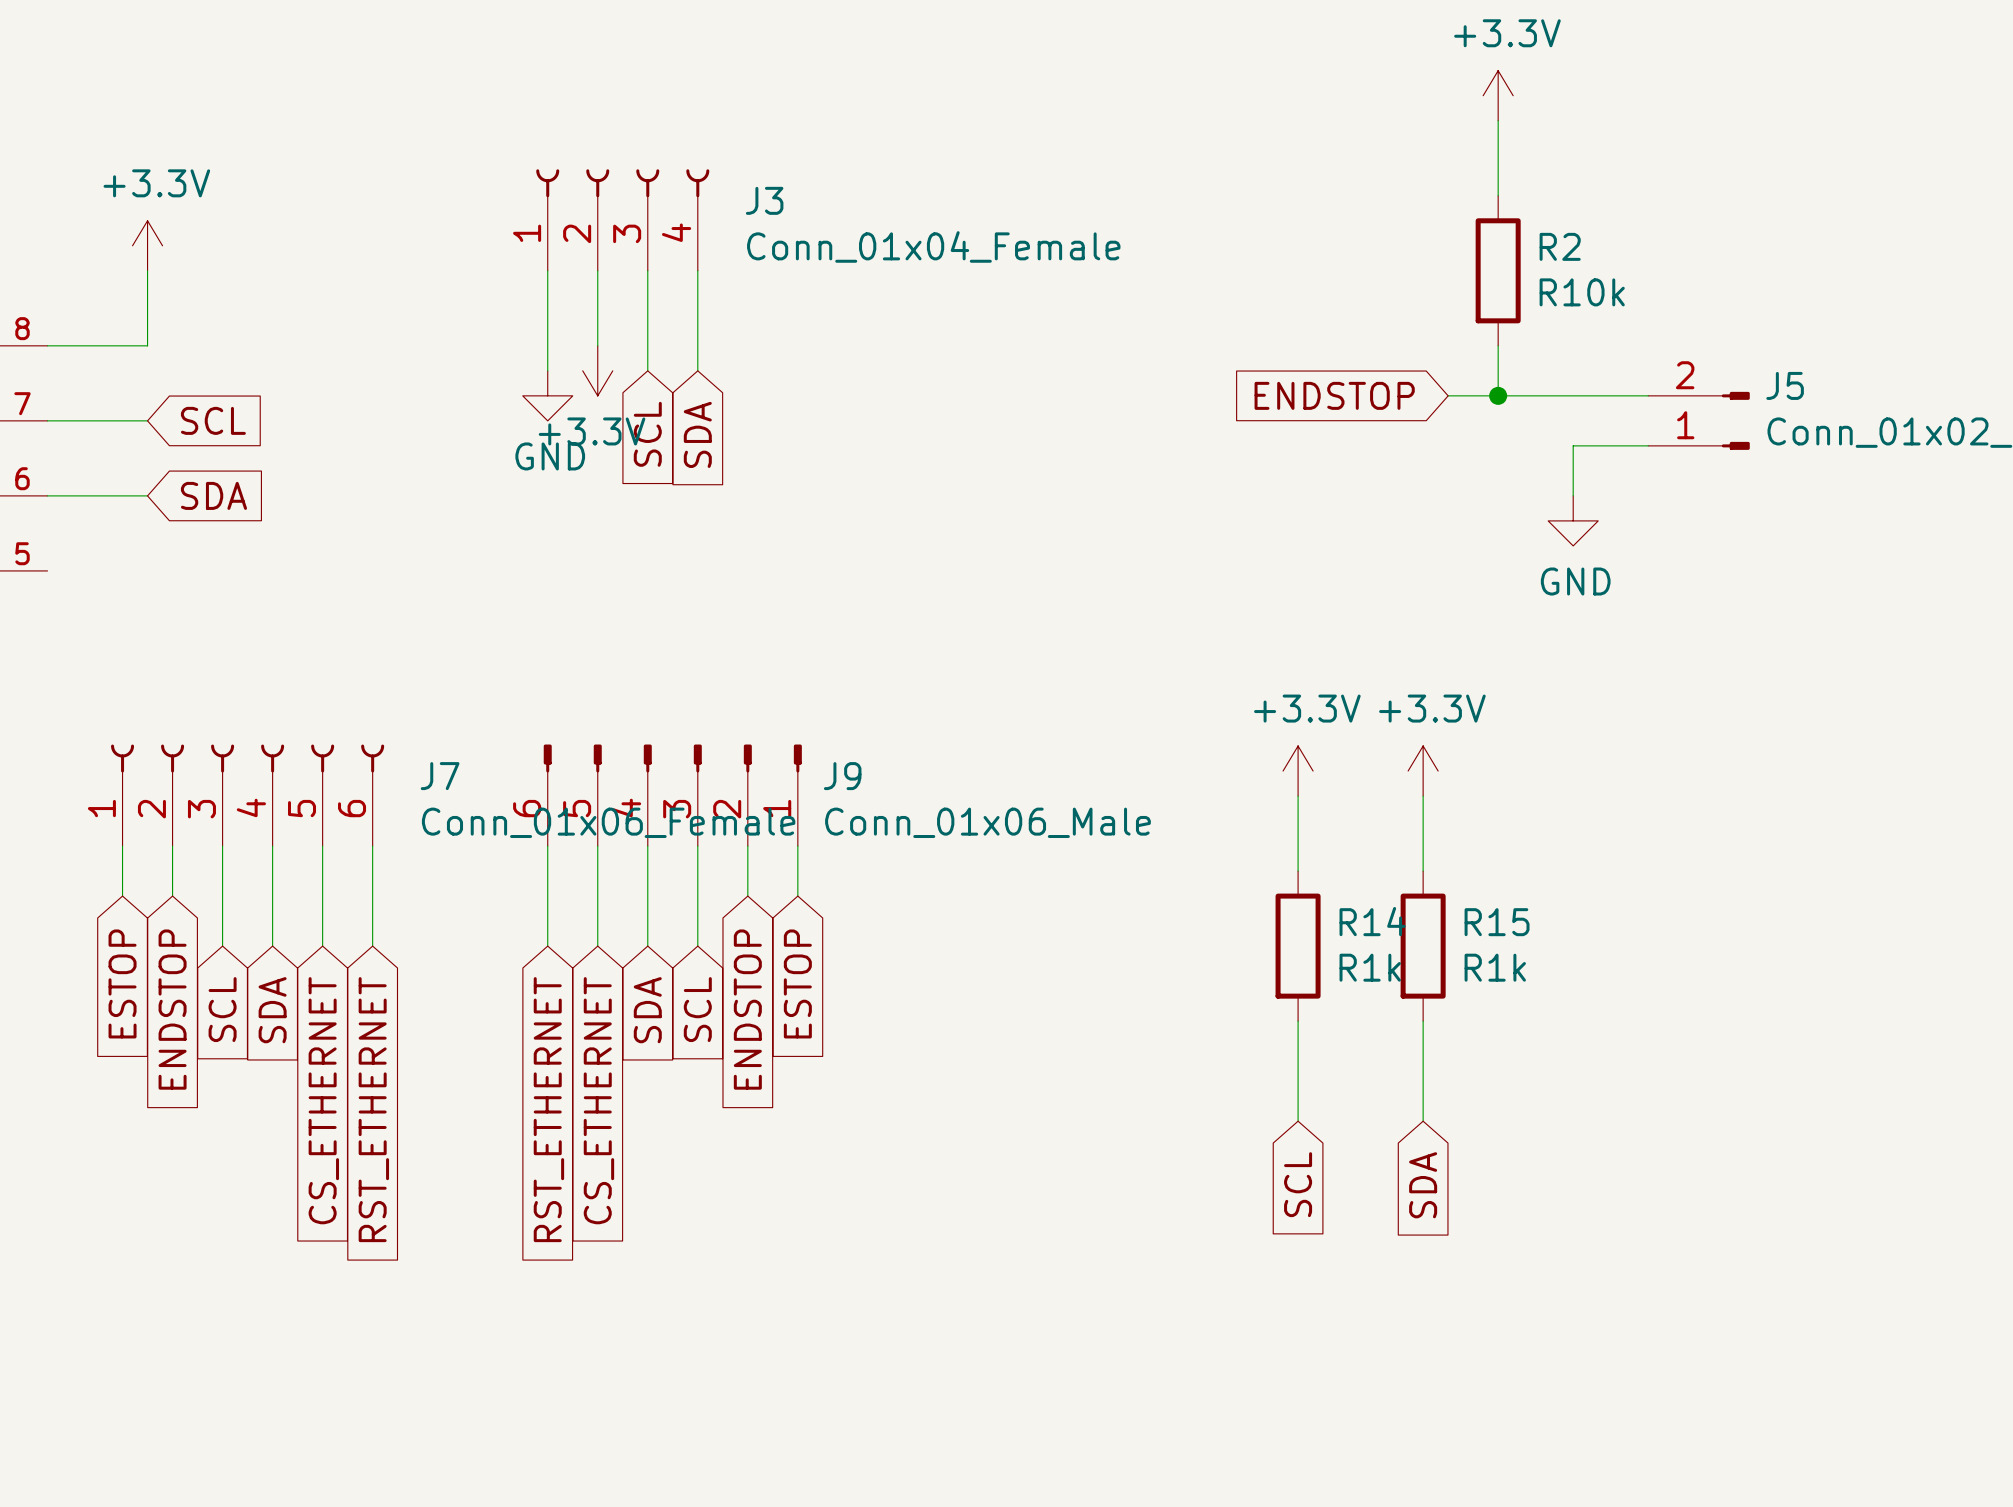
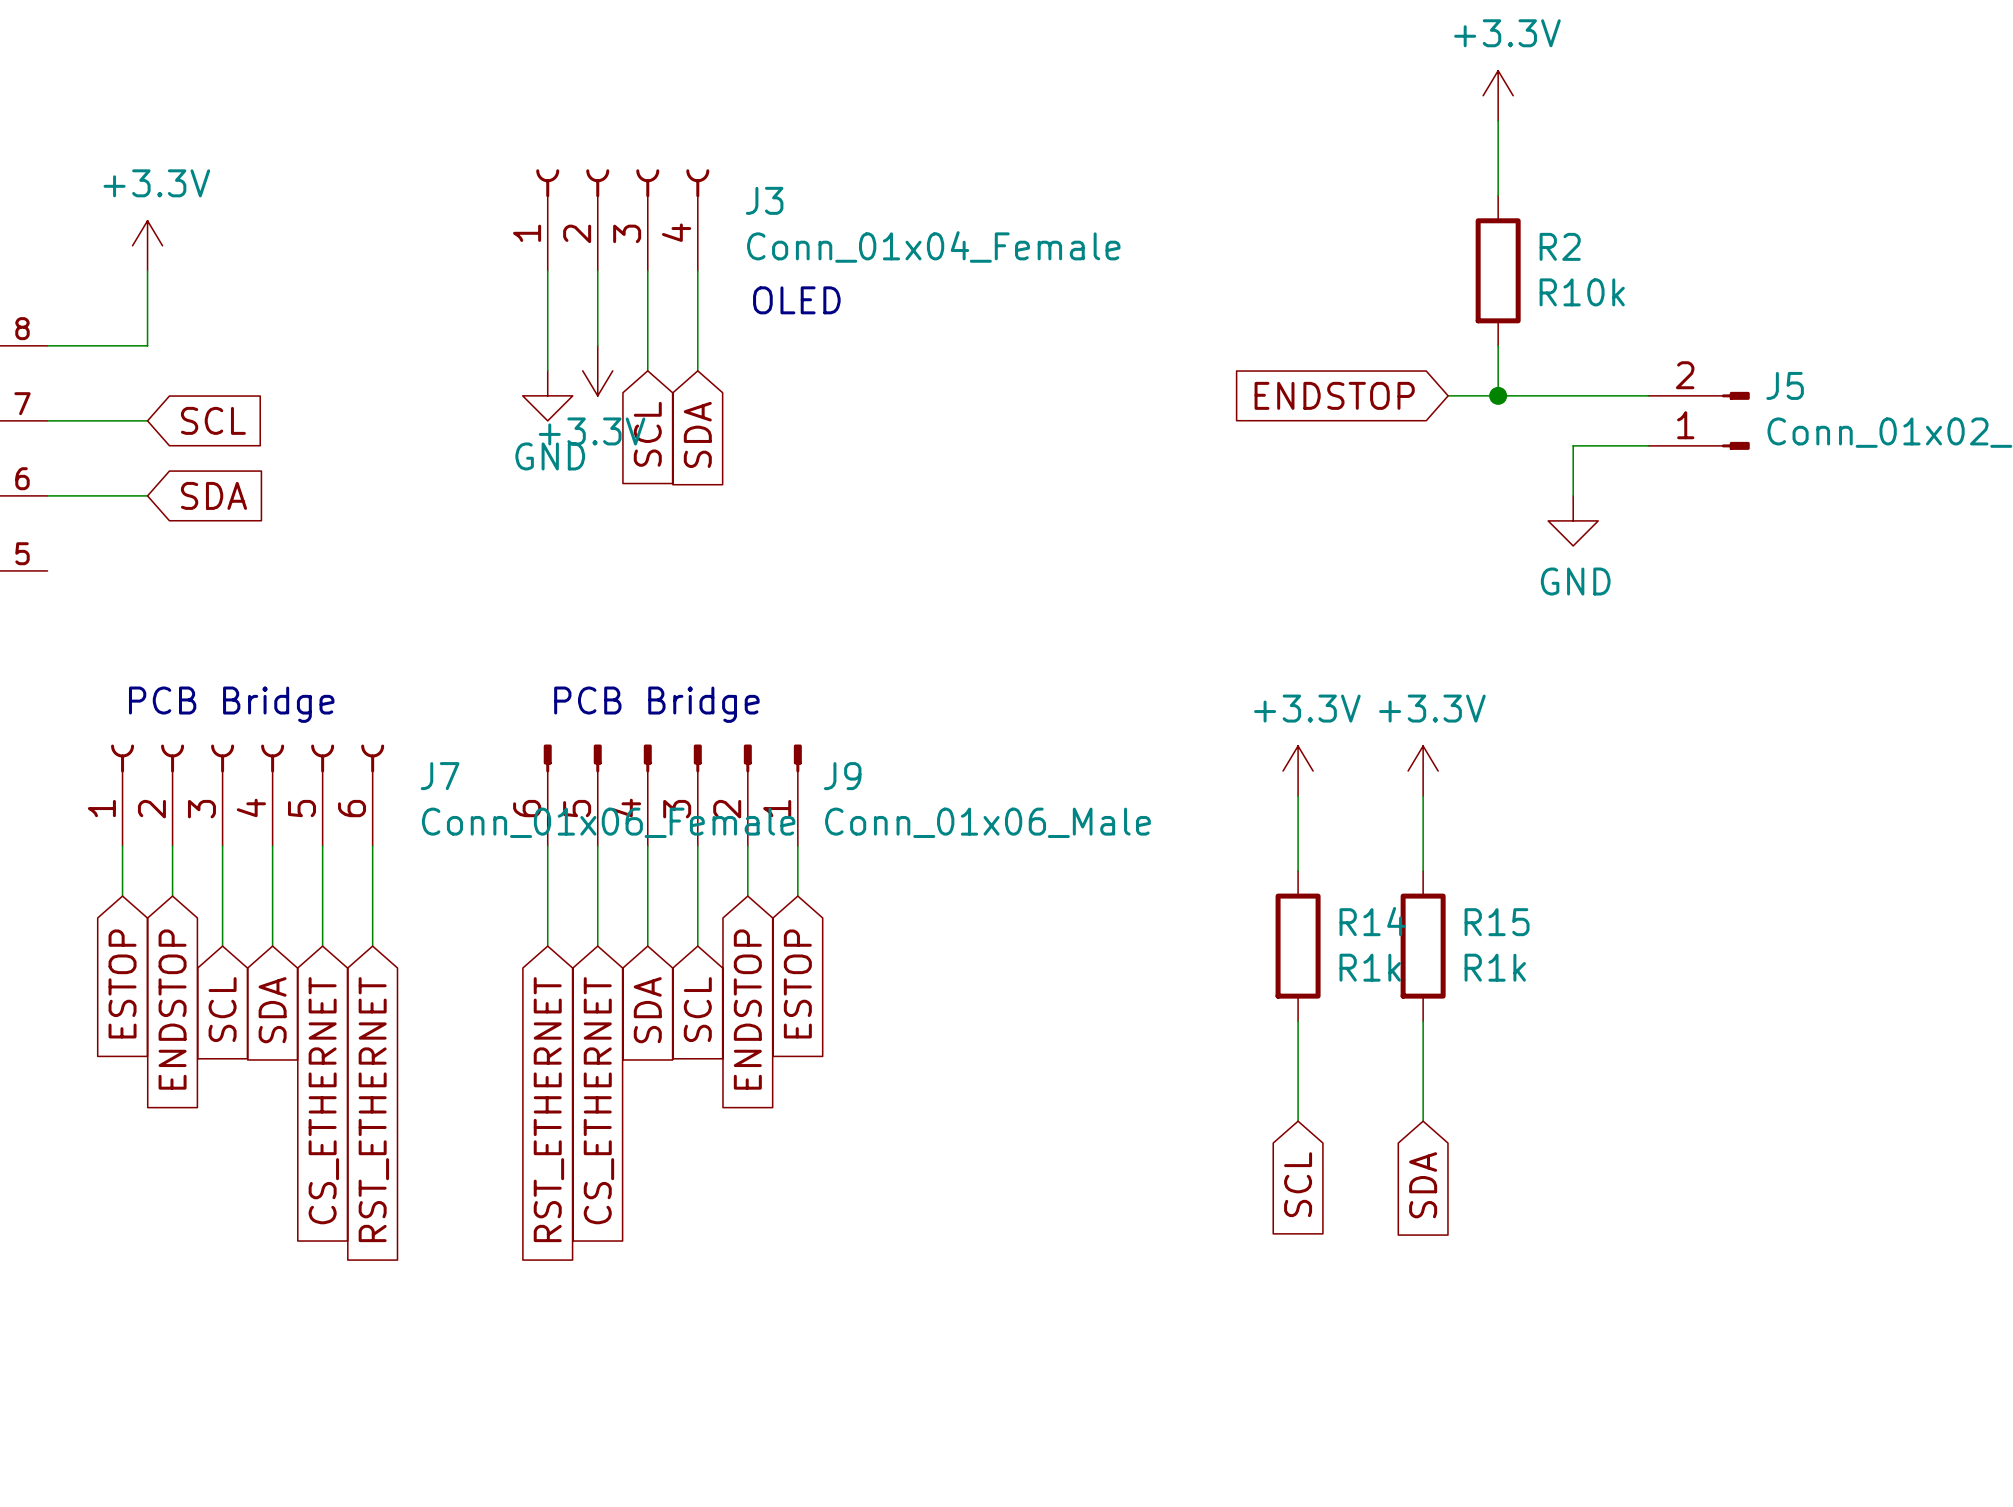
text: none -> OLED (796, 300)
text: none -> PCB Bridge (231, 704)
text: none -> PCB Bridge (656, 704)

